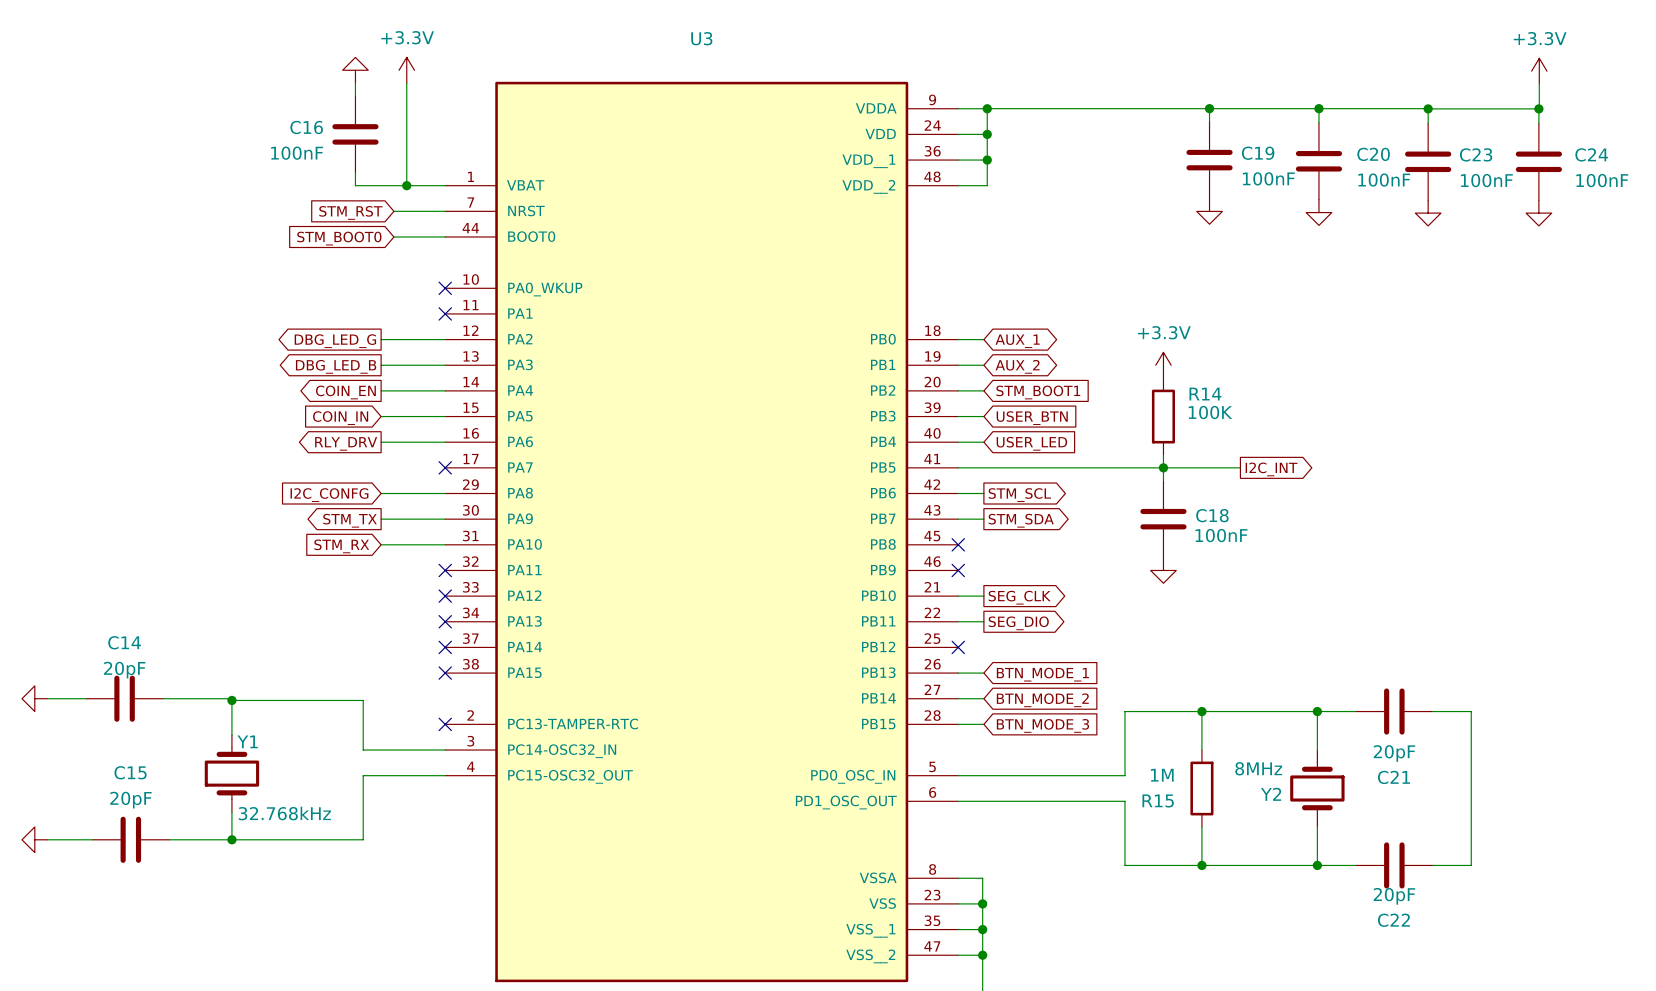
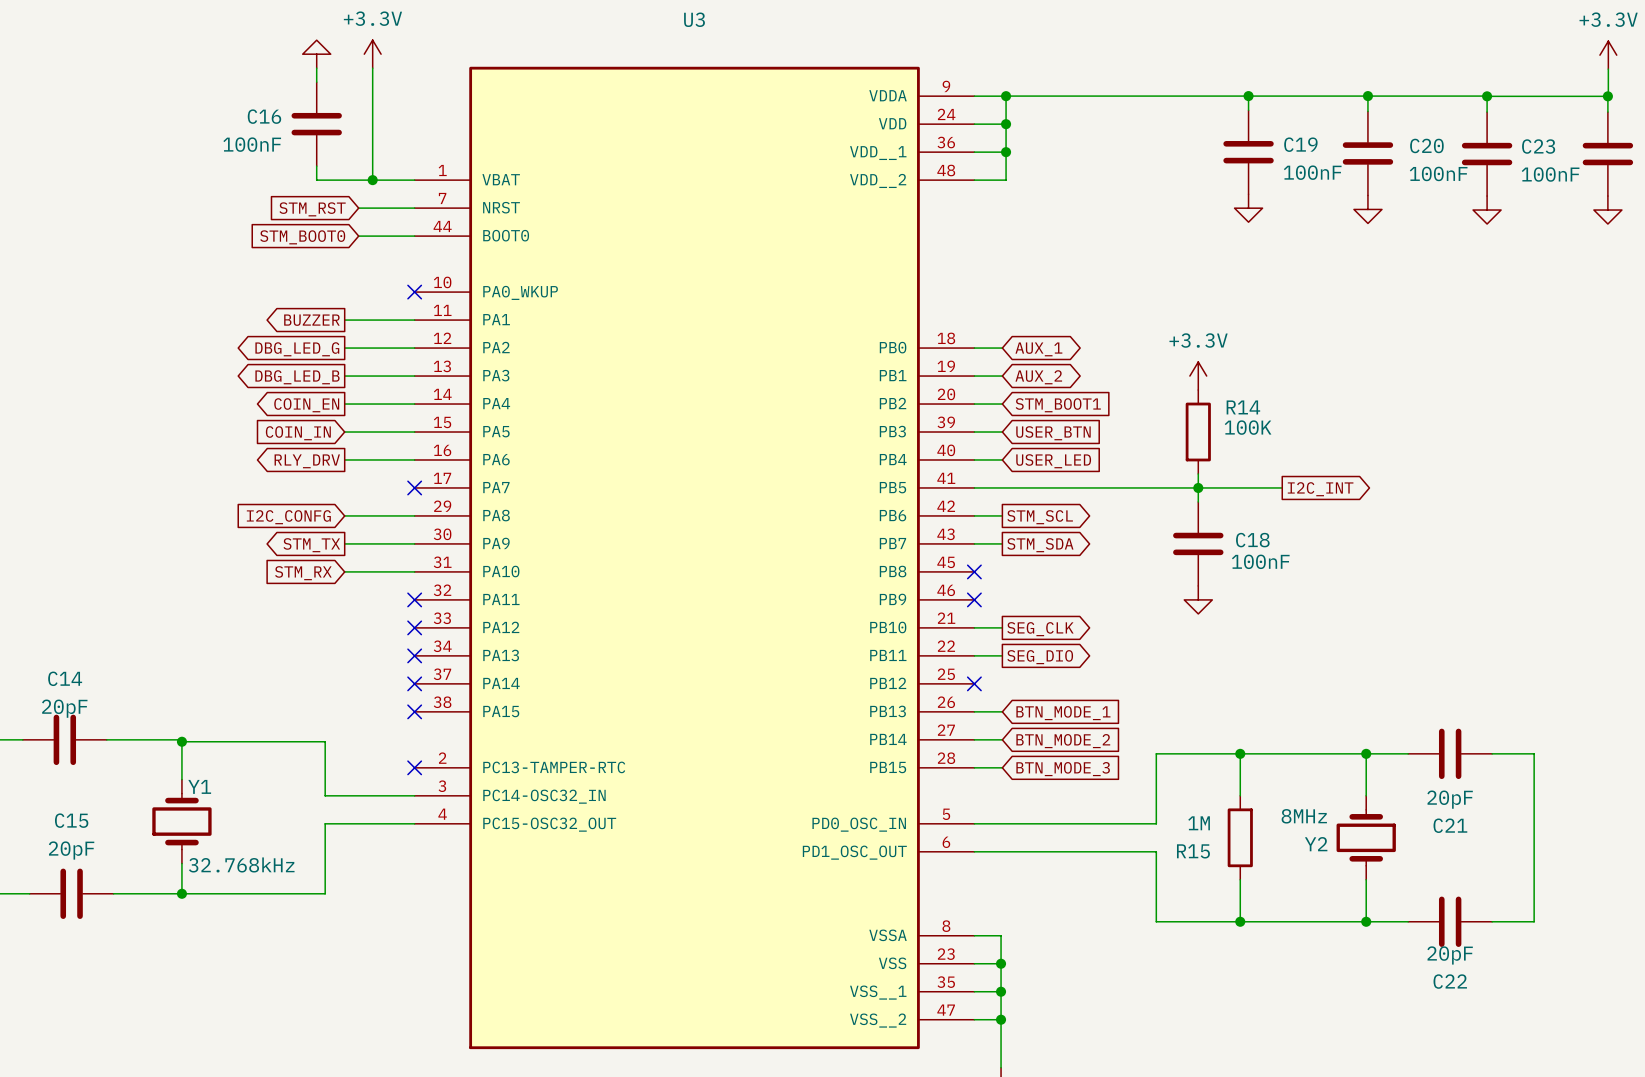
wire: none -> (344, 320) (414, 320)
no-connect mark: (445, 313) -> none
global label: none -> BUZZER (311, 320)

